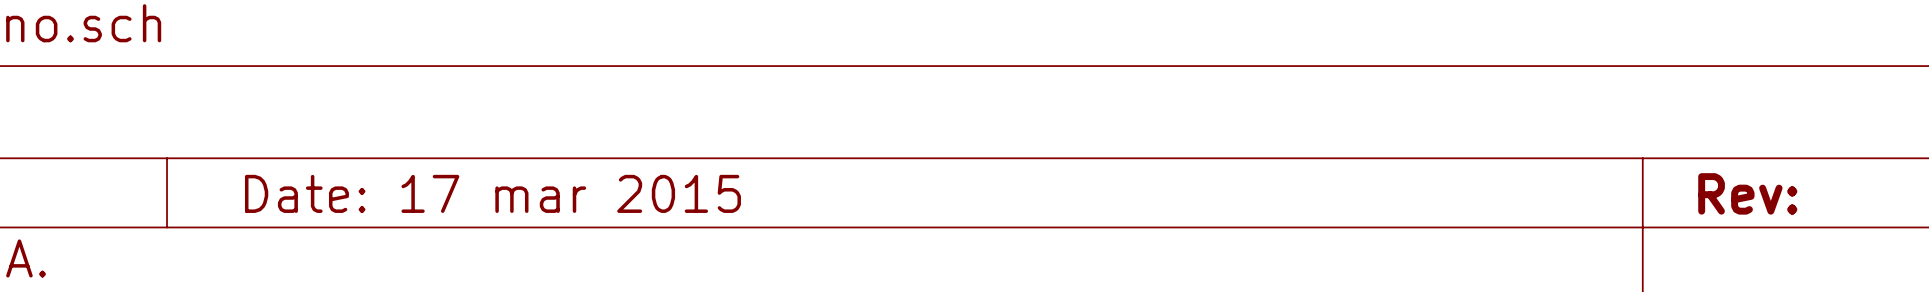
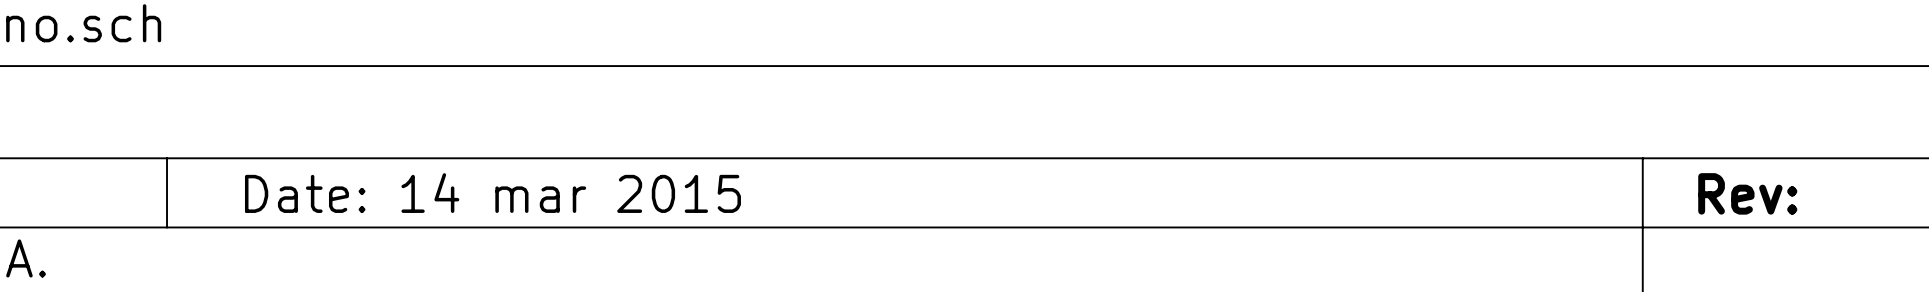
title block: Date: 17 mar 2015 (492, 193) -> Date: 14 mar 2015 (492, 193)

